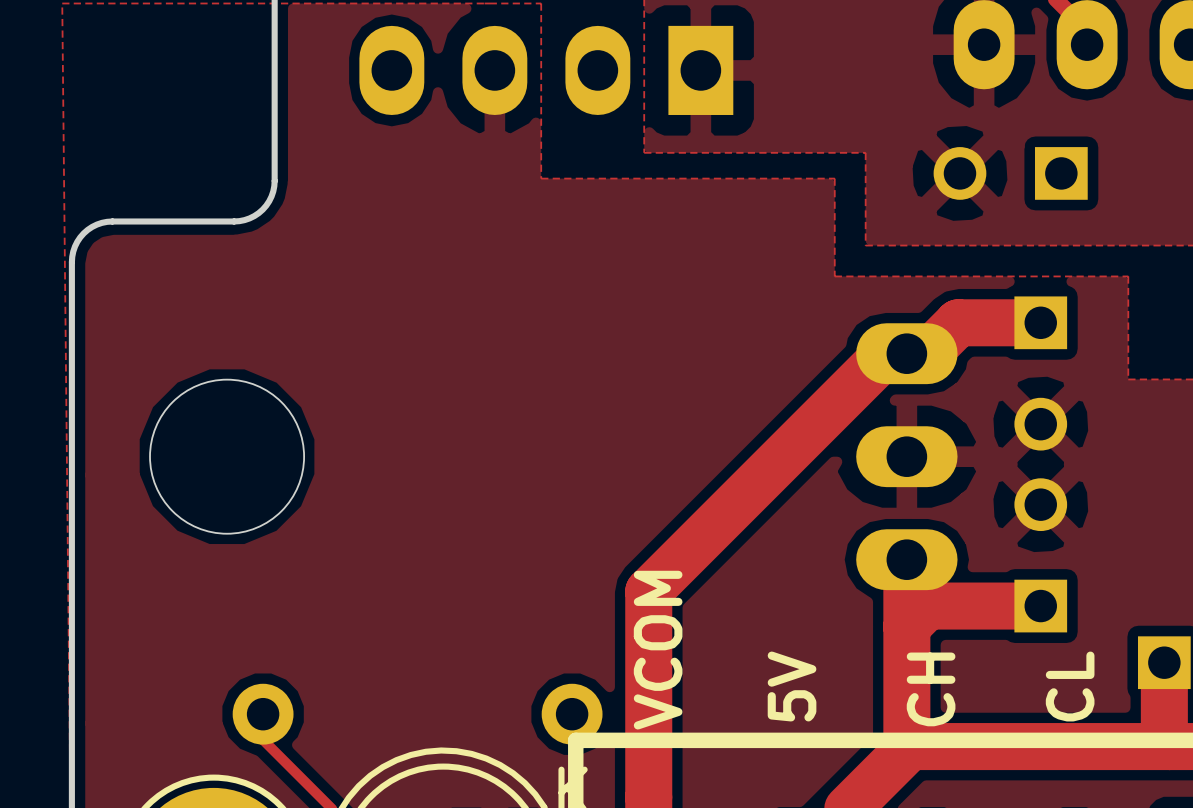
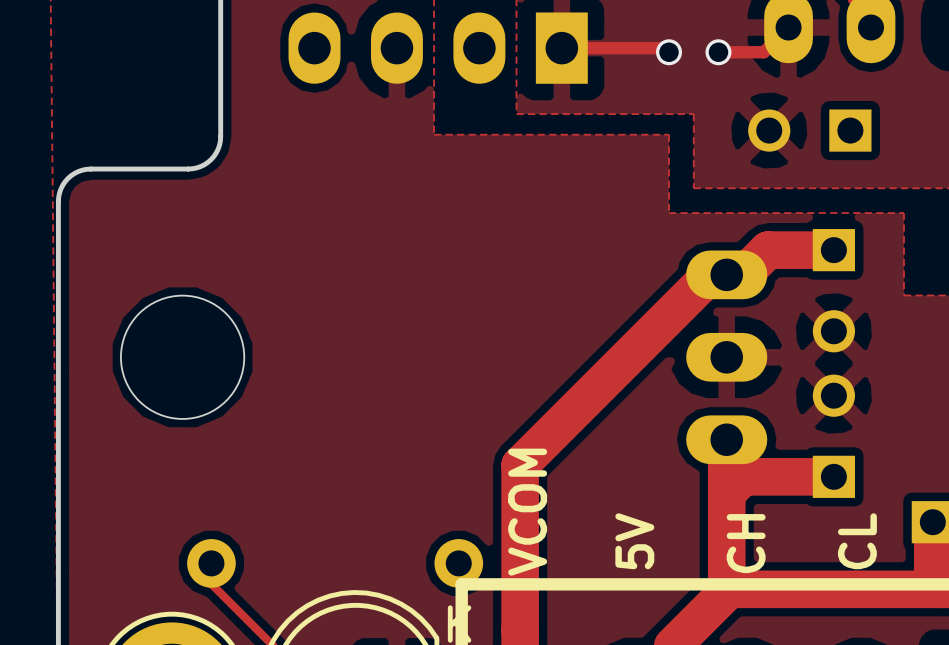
track: none -> (788, 27) (763, 52) (718, 52)
track: none -> (561, 48) (664, 48) (669, 52)
via: none -> (669, 52)
via: none -> (718, 52)

